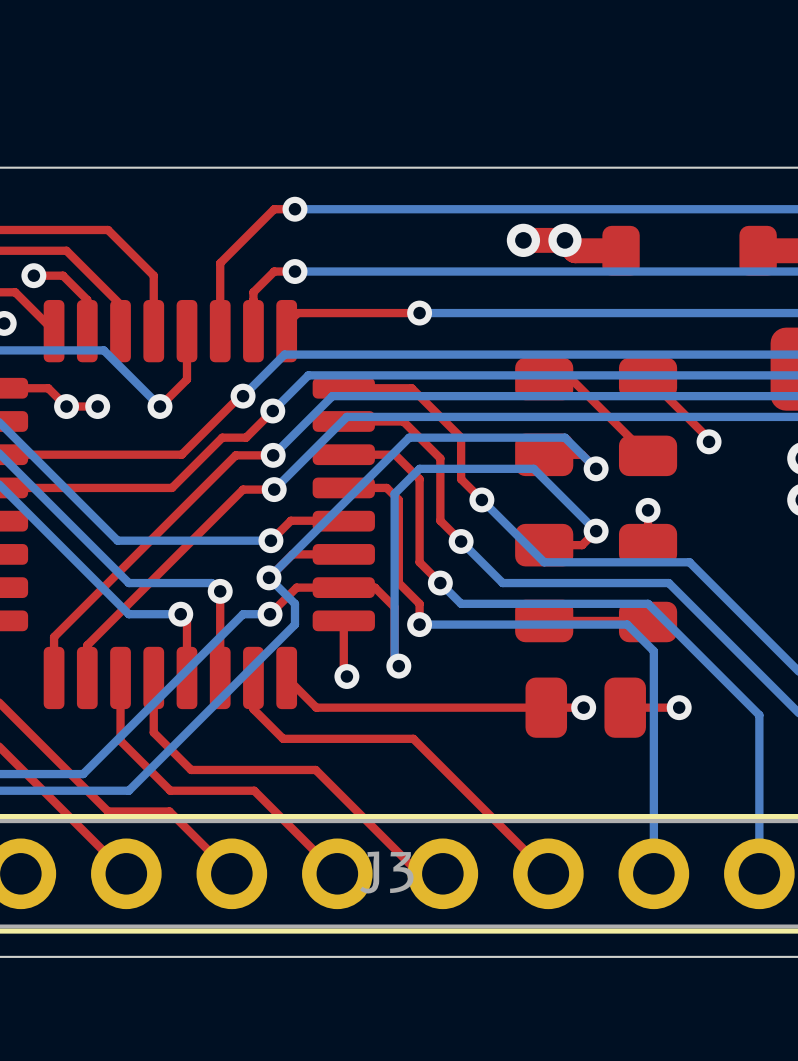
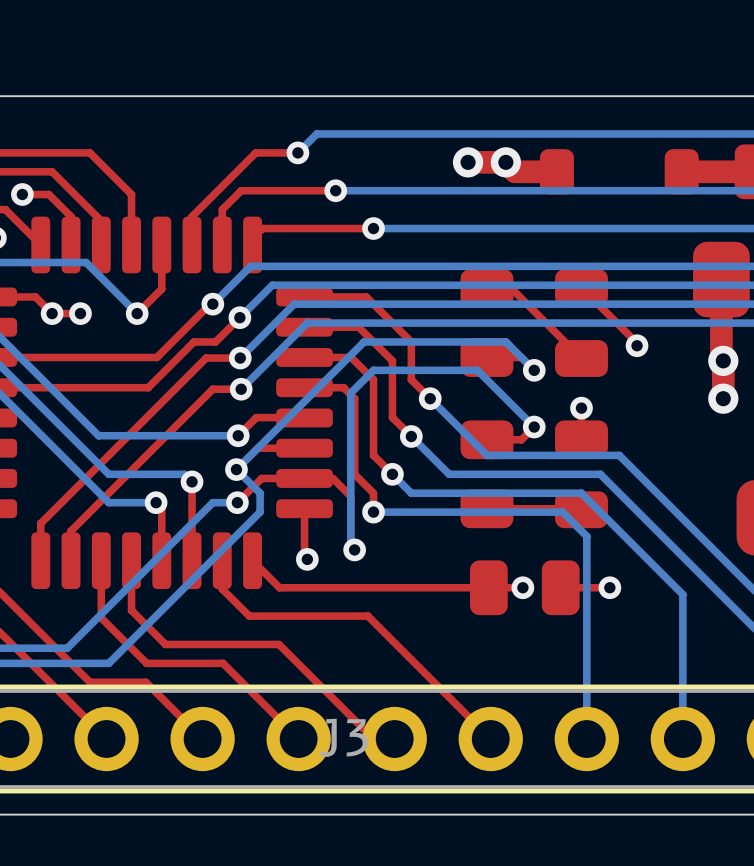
top track: (294, 209) (274, 209) (220, 263) (220, 299) -> (297, 152) (255, 152) (192, 216)
via: (294, 209) -> none
bottom track: (357, 209) (294, 209) -> (316, 133) (297, 152)
via: none -> (297, 152)
via: (294, 271) -> none
top track: none -> (335, 190) (260, 190)
bottom track: (378, 271) (294, 271) -> none
via: none -> (335, 190)

